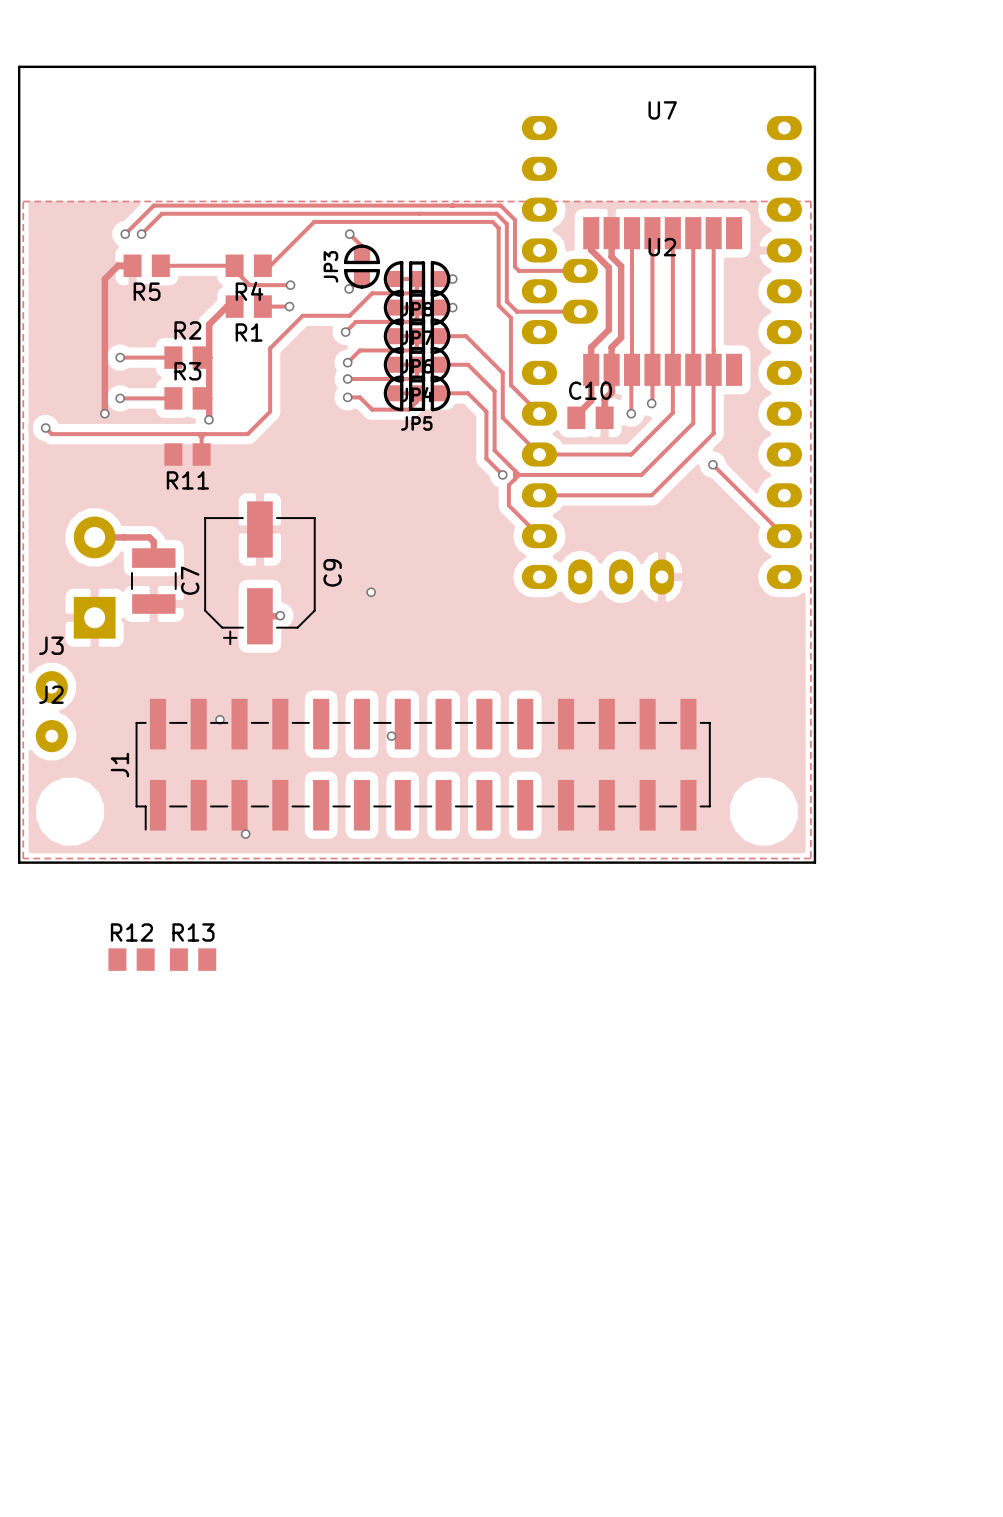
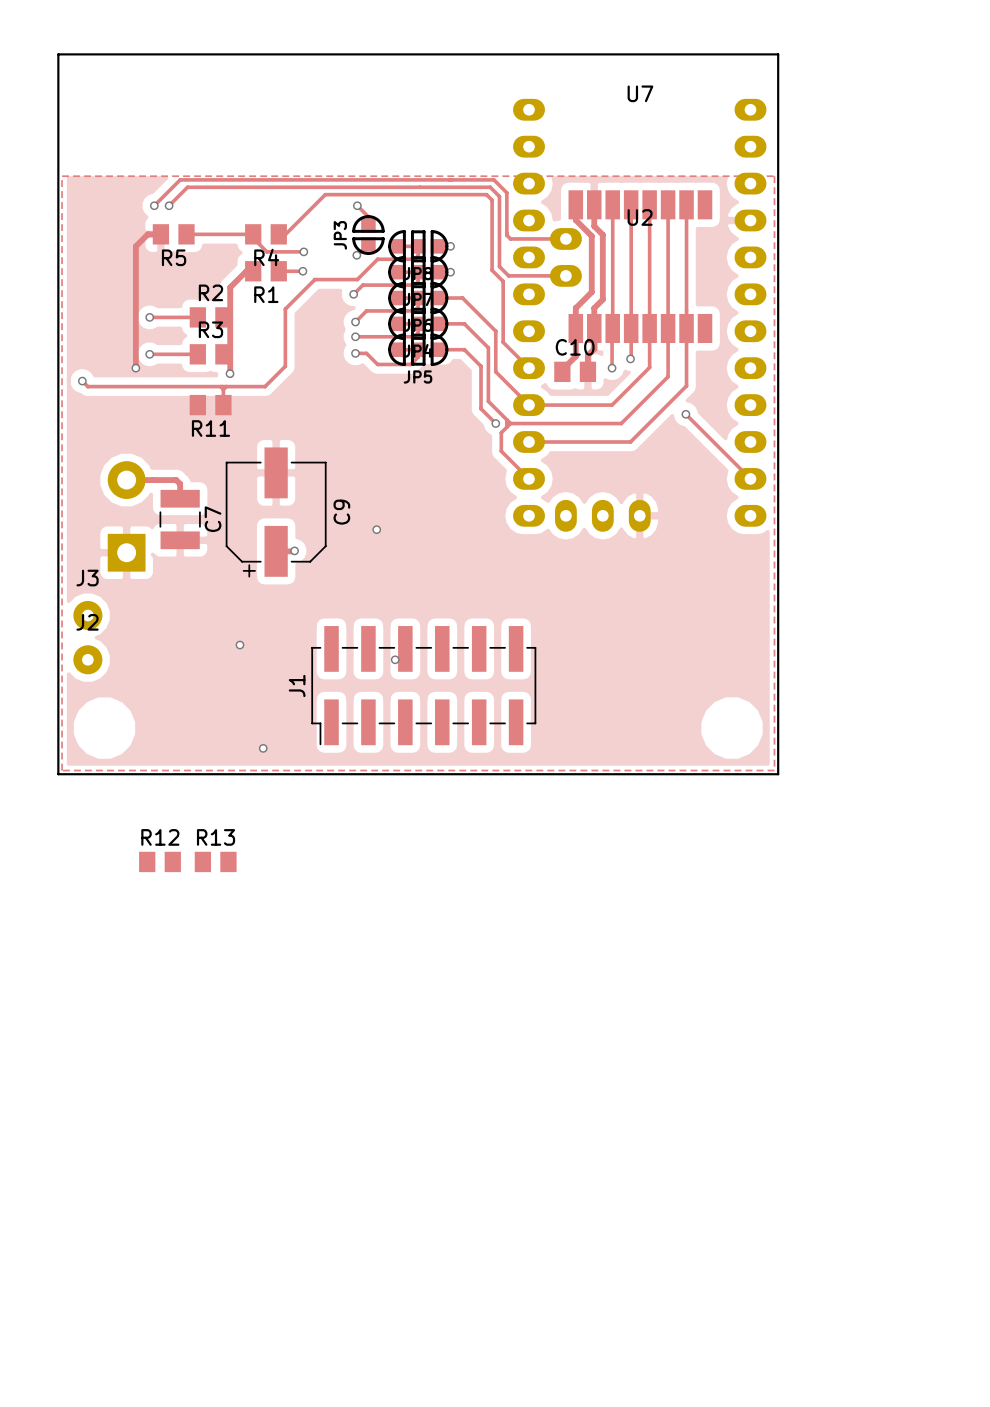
J1 footprint: [135, 698, 711, 831] -> [311, 626, 537, 746]
J1 name position: J1 (119, 765) -> J1 (297, 685)

